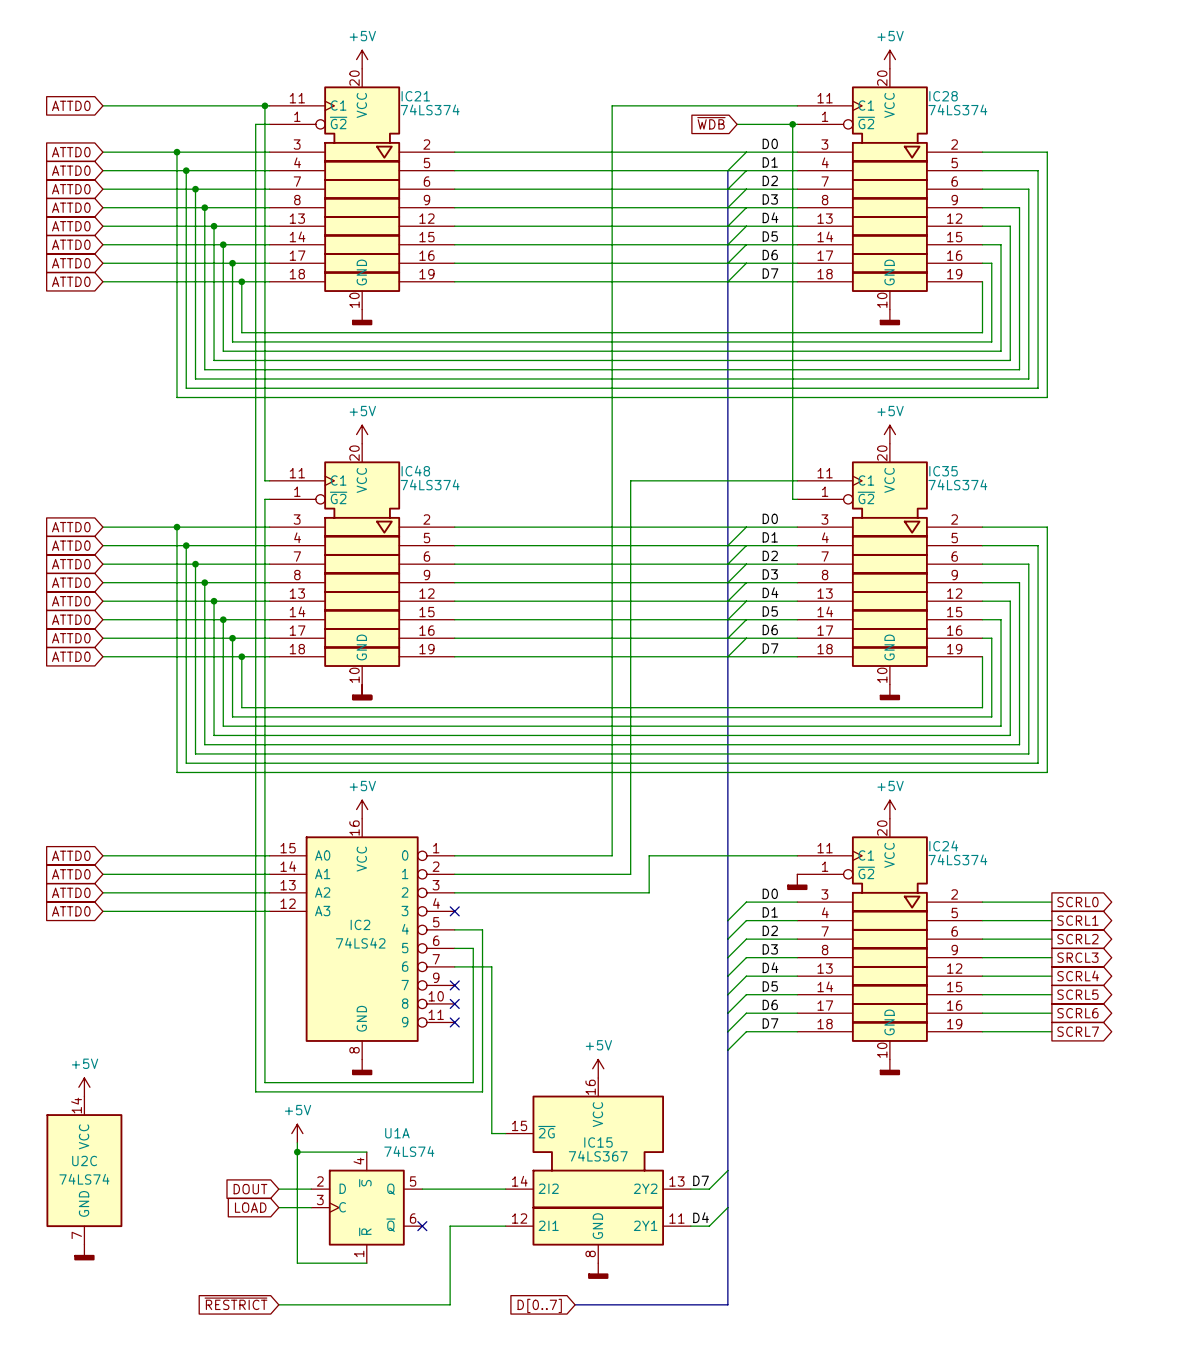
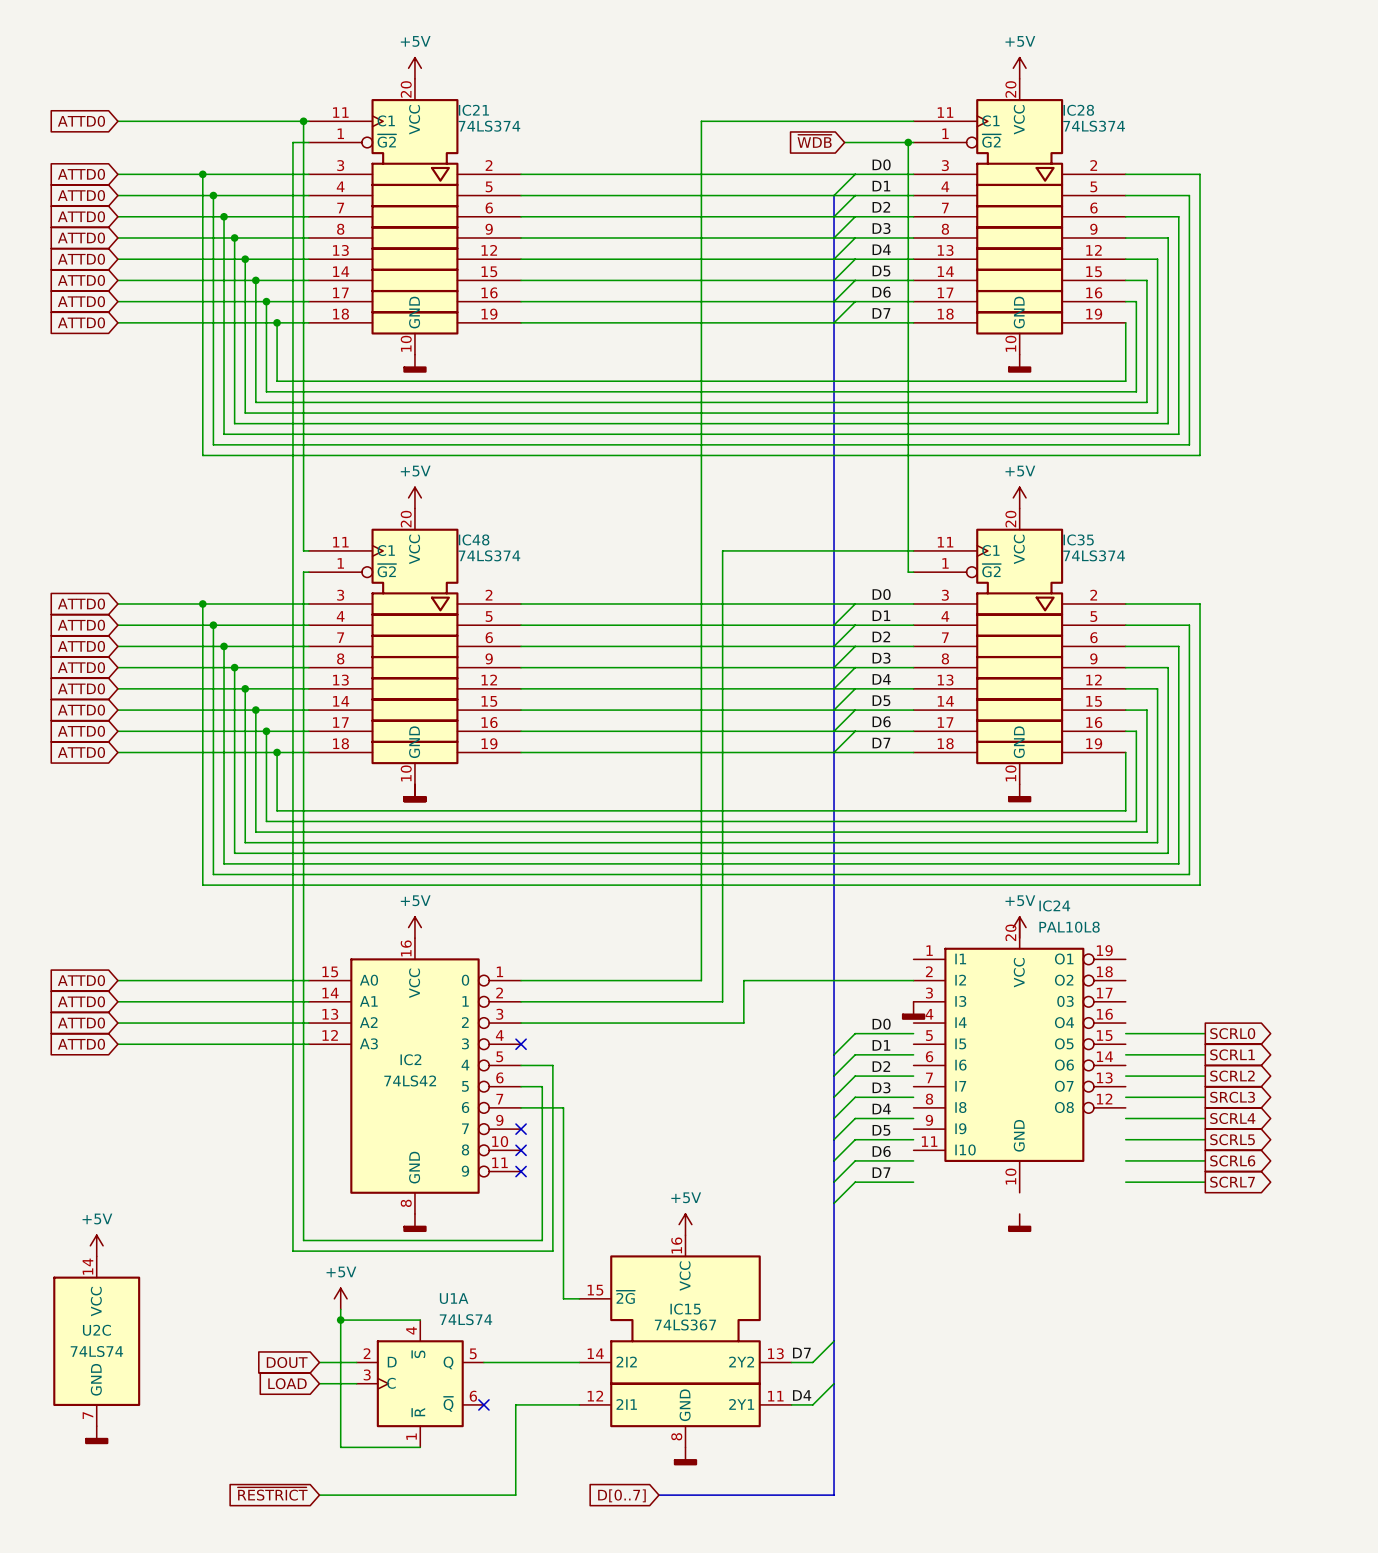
IC24 symbol: [797, 818, 983, 1060] -> [913, 916, 1126, 1193]
IC24 name position: IC24 (943, 845) -> IC24 (1054, 905)
IC24 value: 74LS374 (957, 859) -> PAL10L8 (1069, 927)

